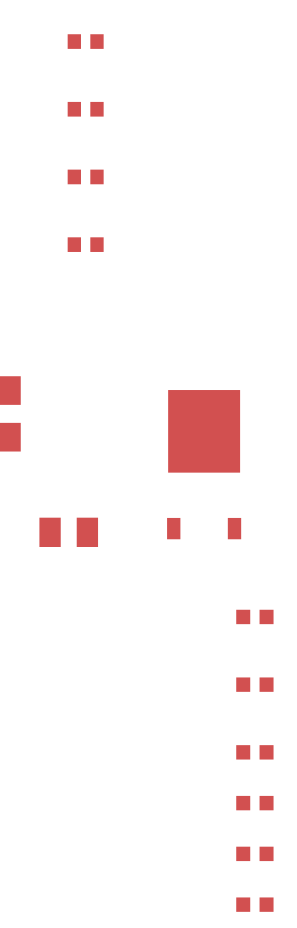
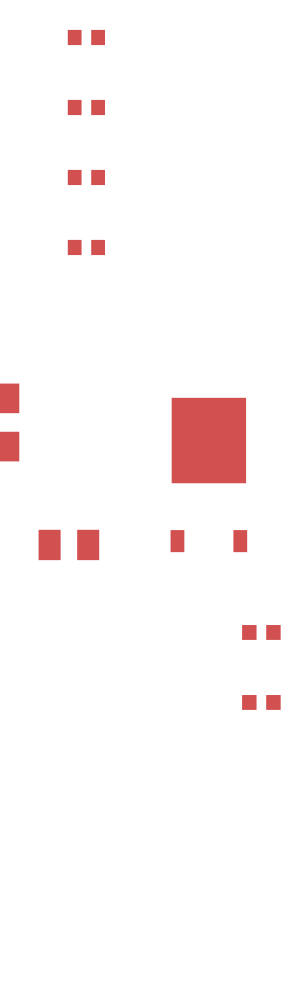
part: (254, 752) -> none
part: (254, 803) -> none
part: (254, 853) -> none
part: (254, 904) -> none

